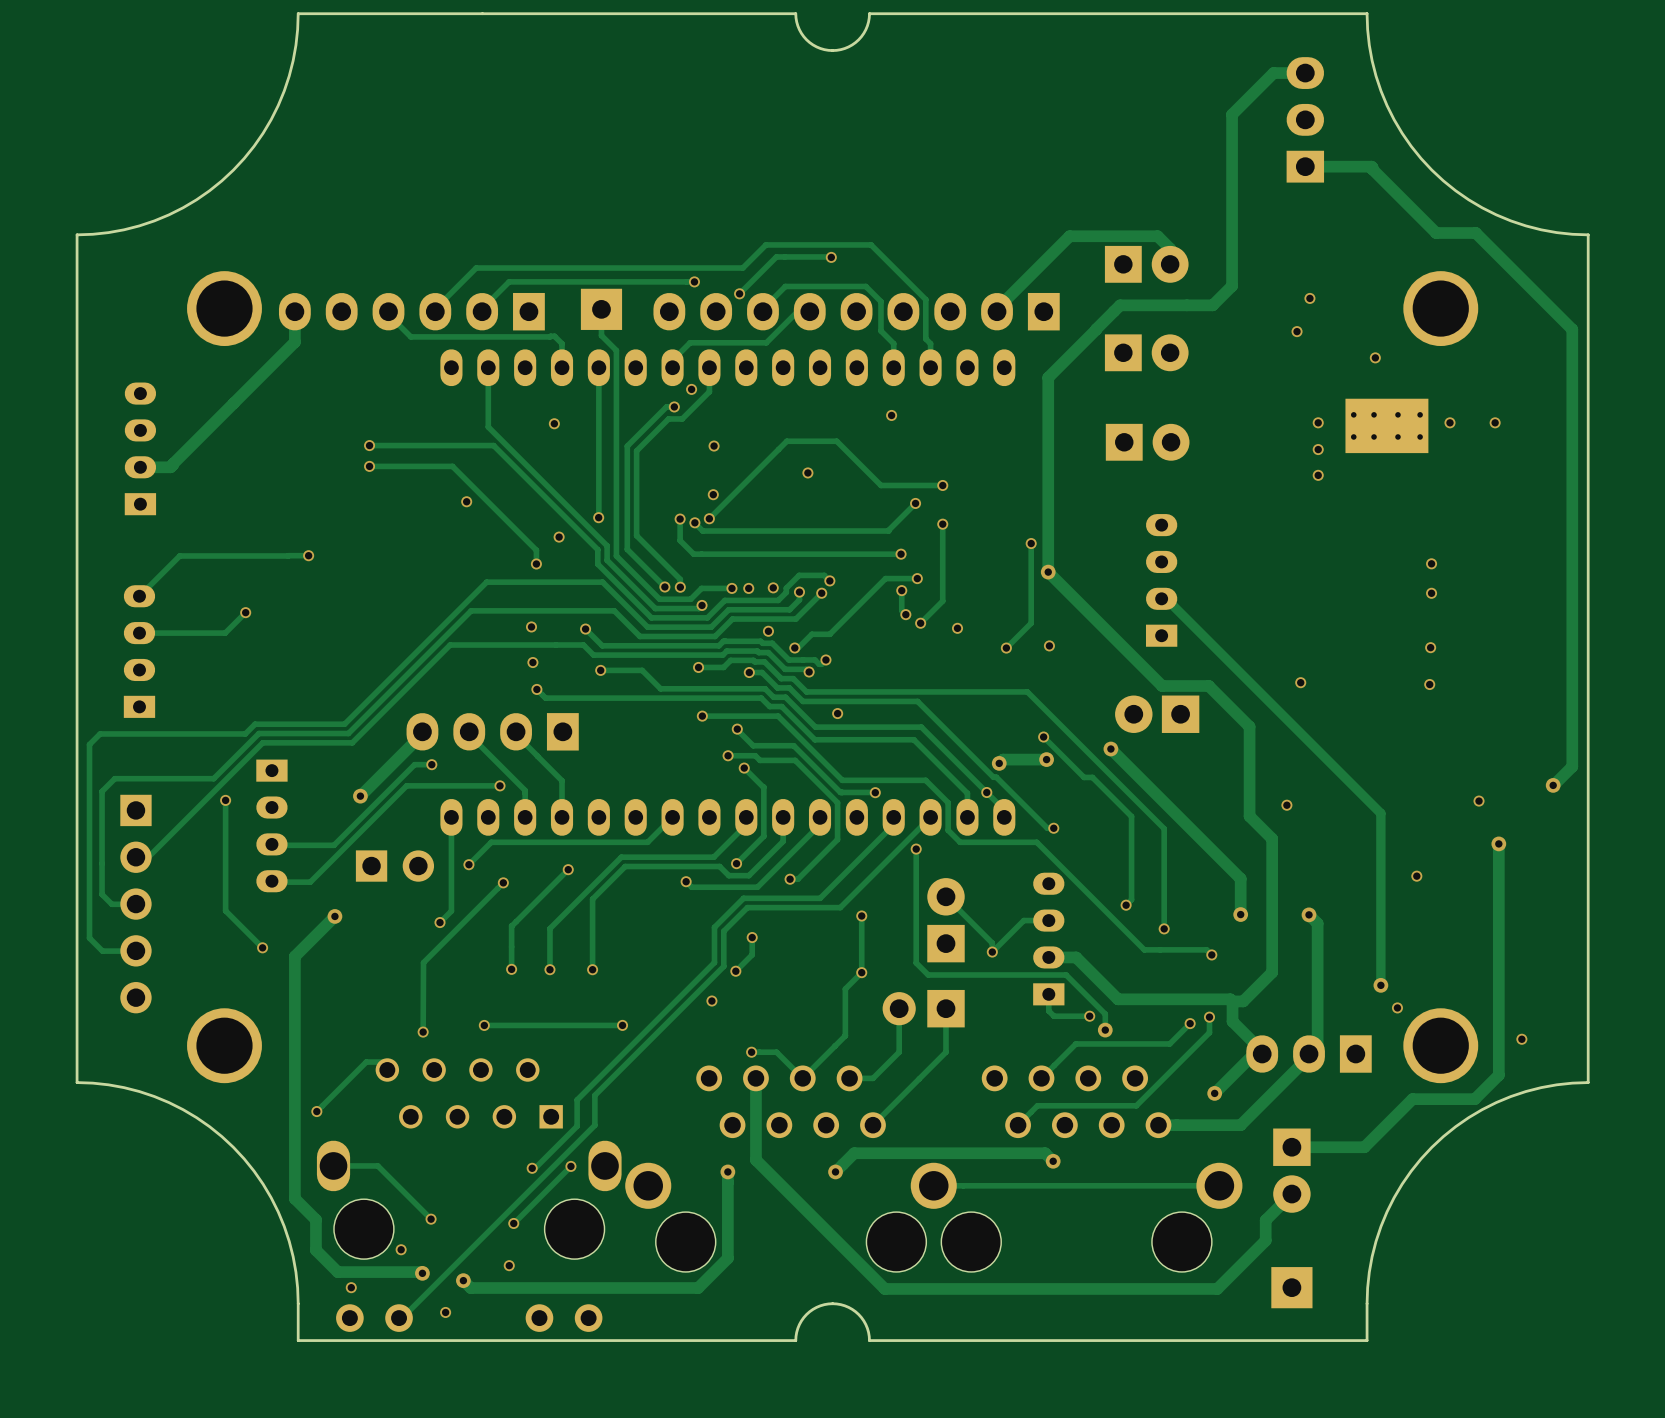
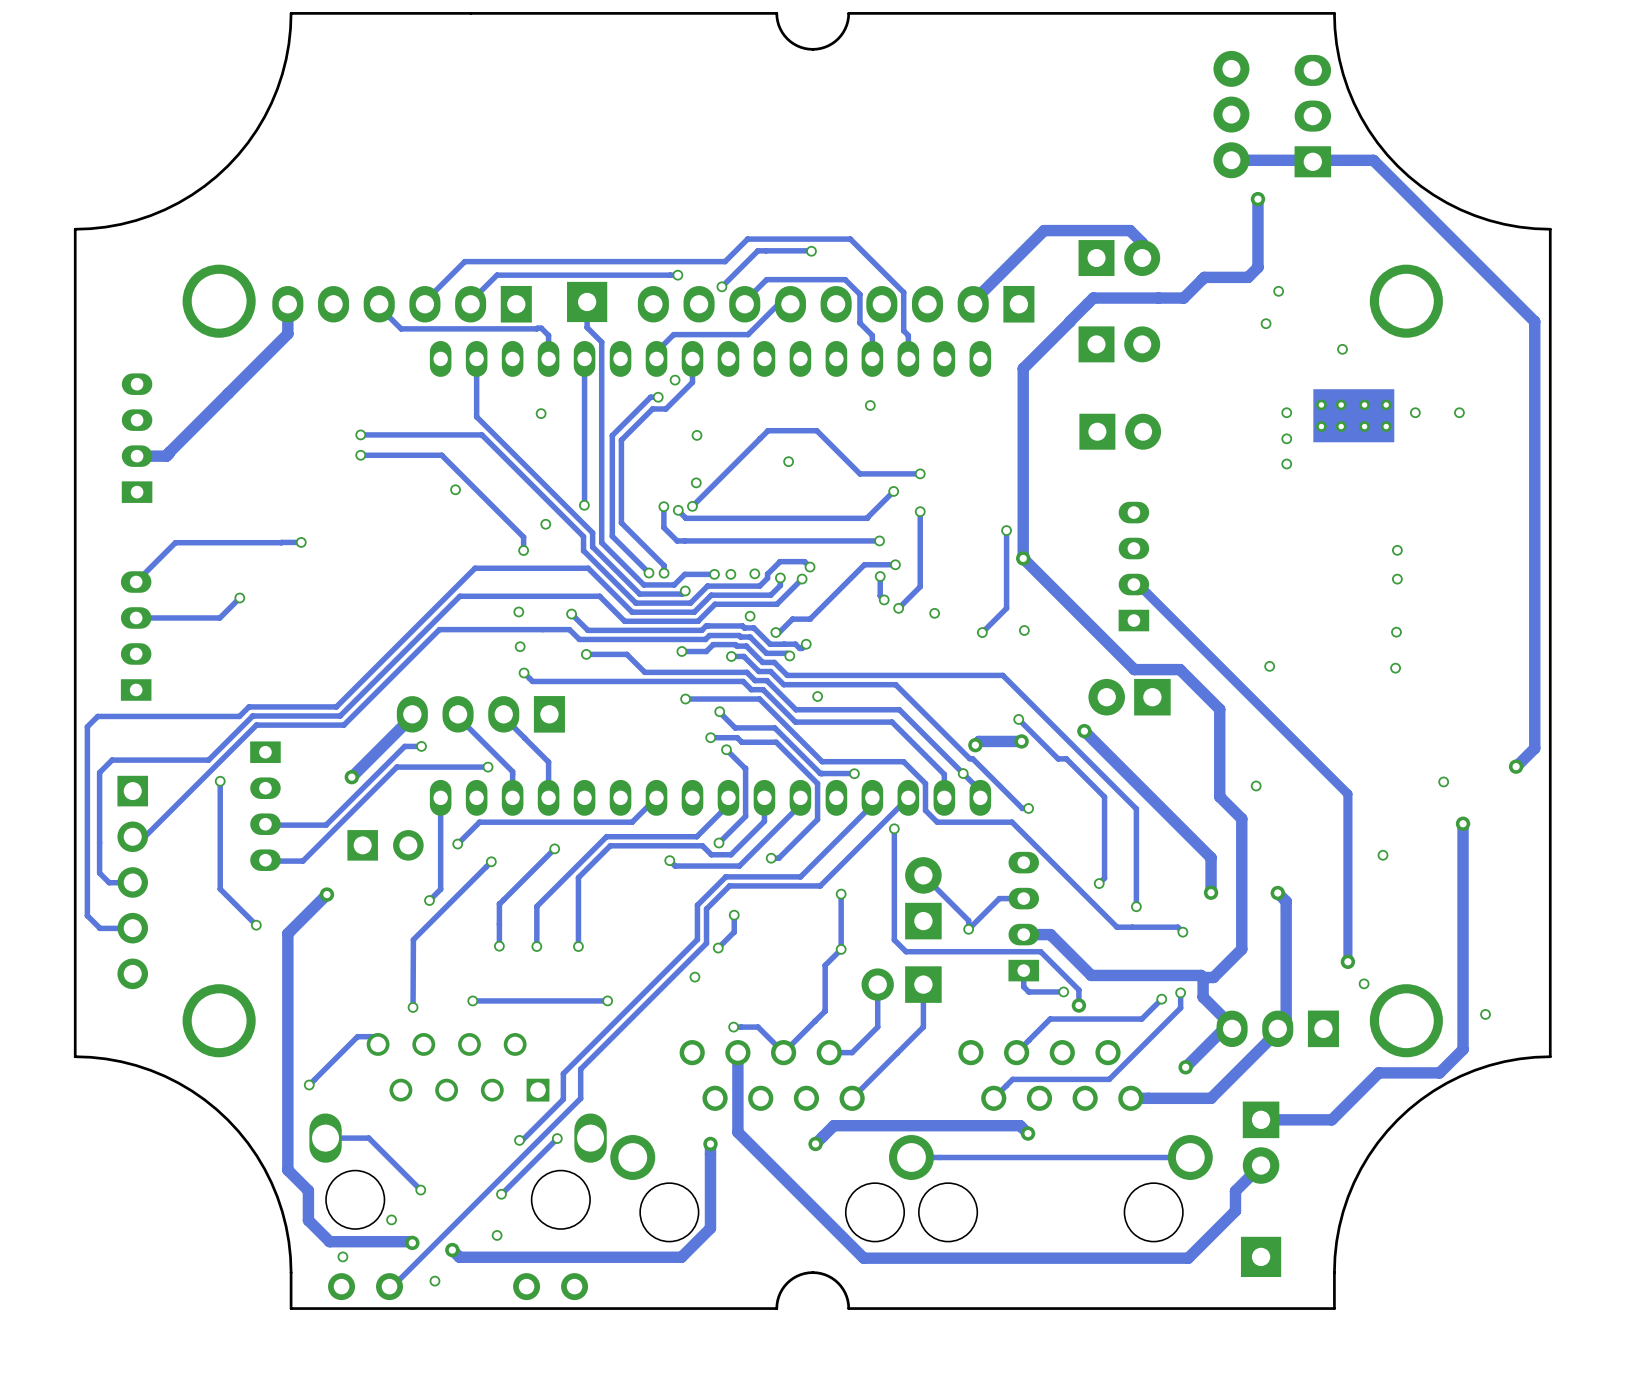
track: (1305, 73) (1273, 73) (1232, 114) (1232, 285) -> (1257, 199) (1257, 267) (1248, 277) (1204, 277) (1202, 279)
part: none -> (1231, 114)
part position: (1305, 119) -> (1312, 116)
track: (1305, 166) (1371, 166) (1436, 233) (1475, 233) -> (1231, 160) (1373, 160) (1440, 227)
via: none -> (1257, 199)

